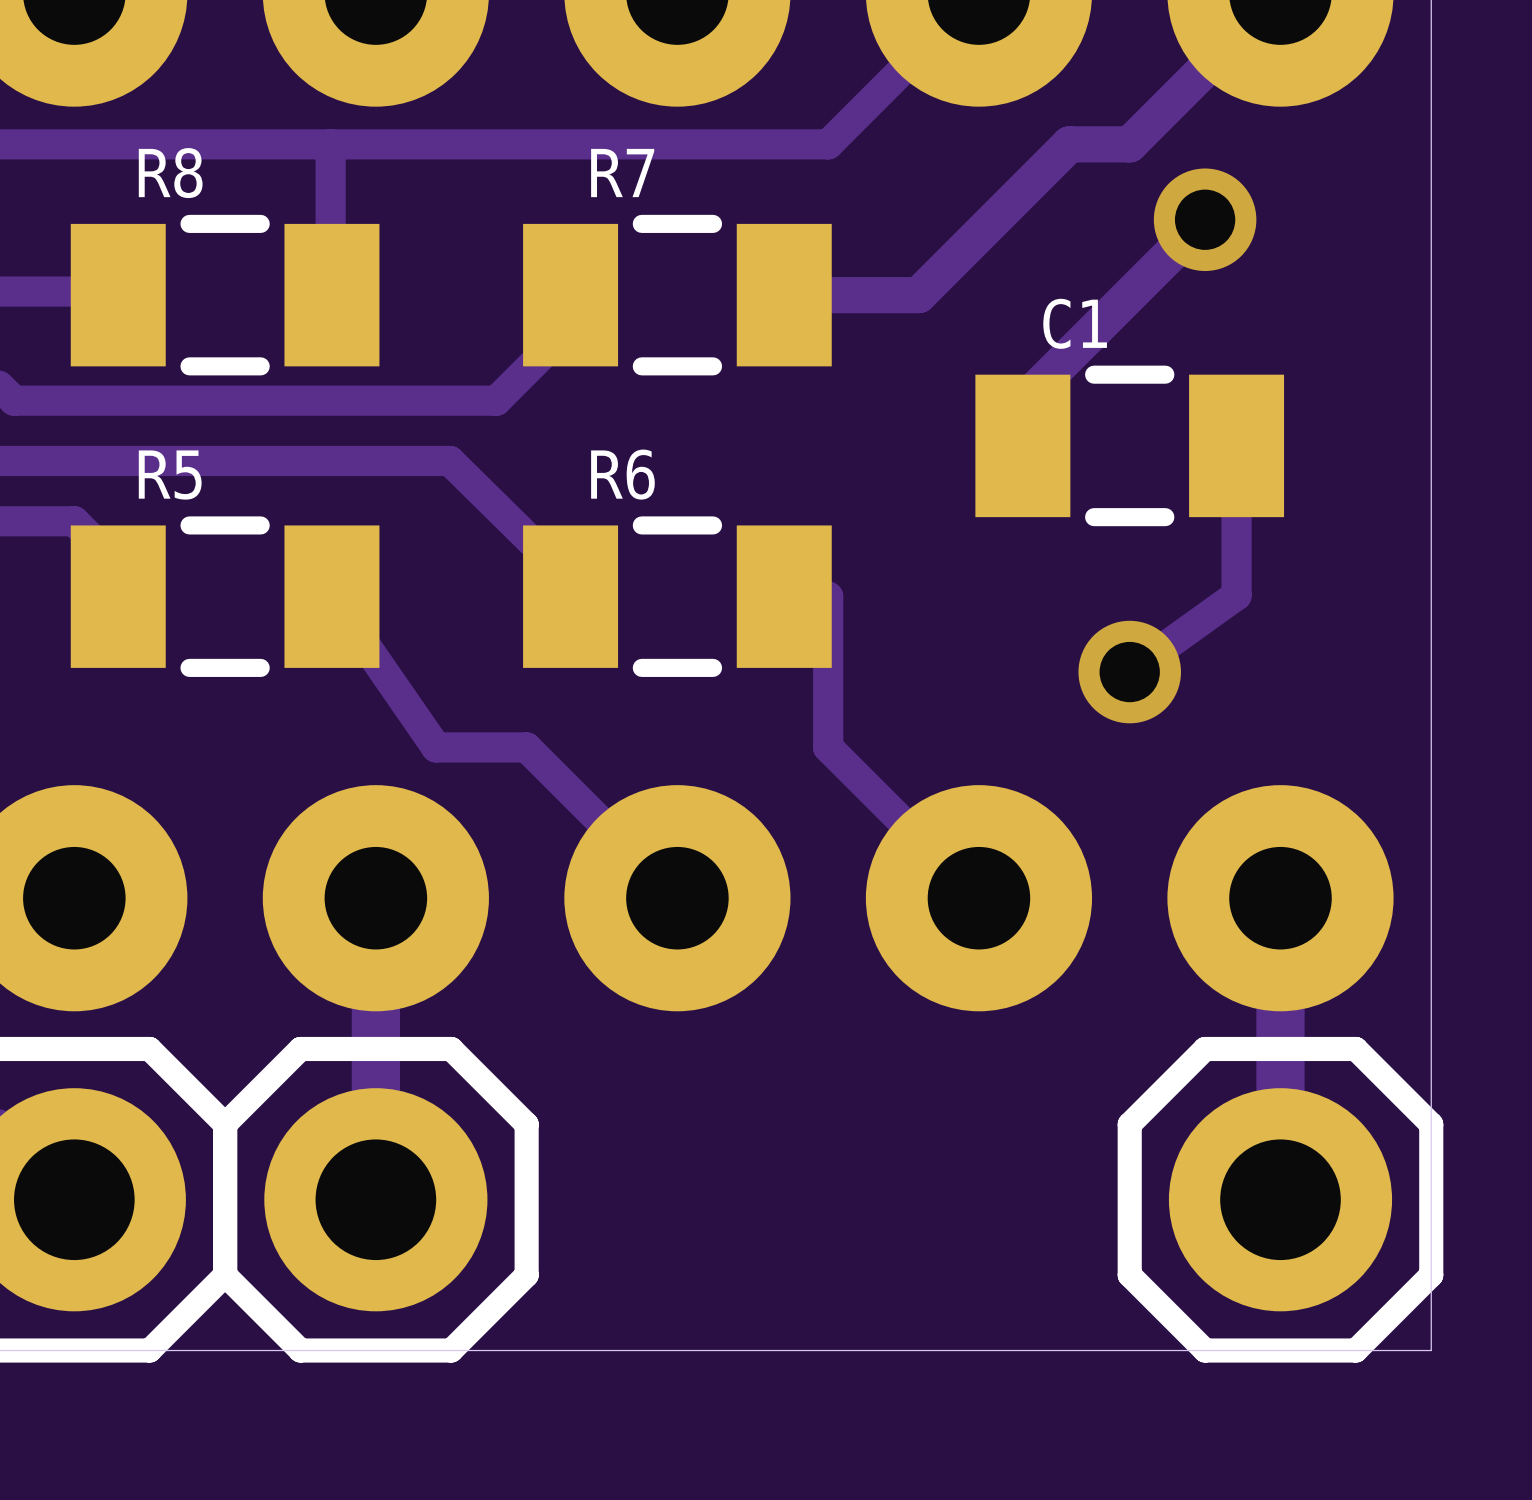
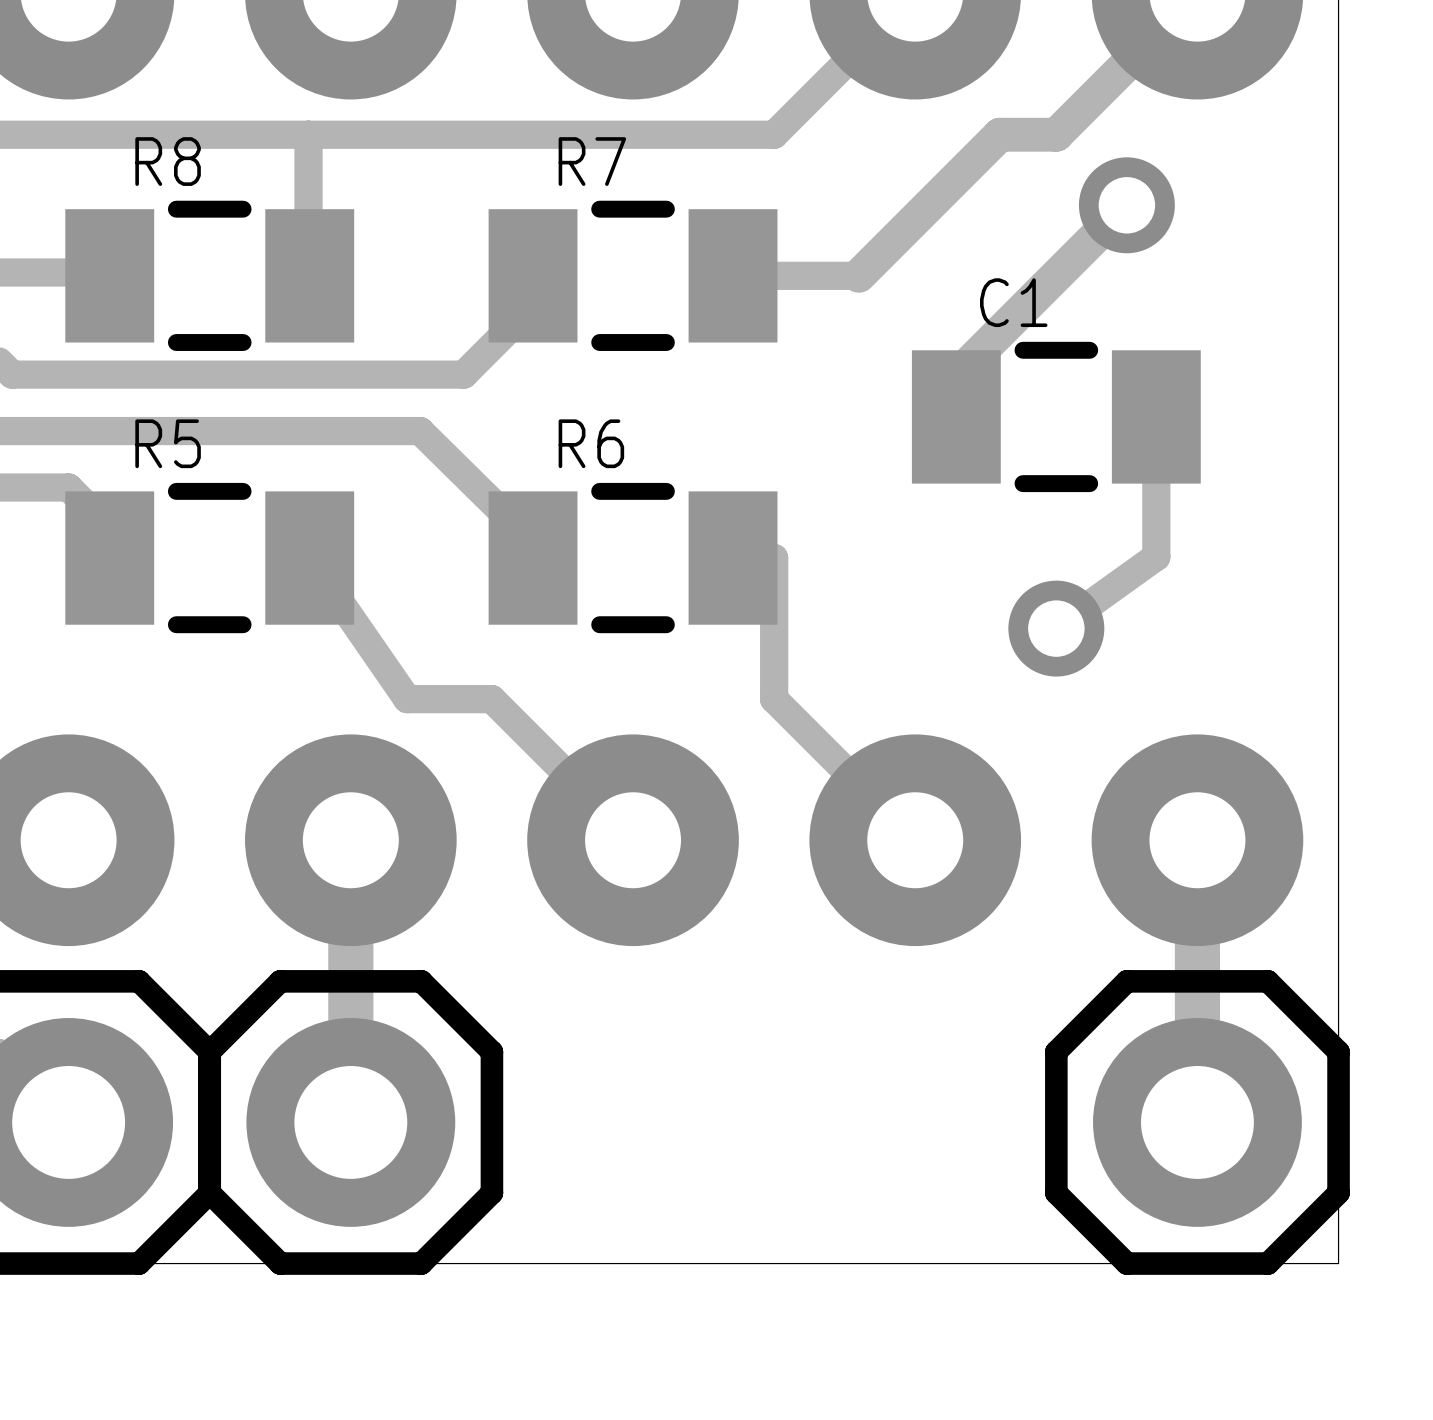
track width: thick (918, 295) (784, 295) -> thin (858, 275) (733, 275)

